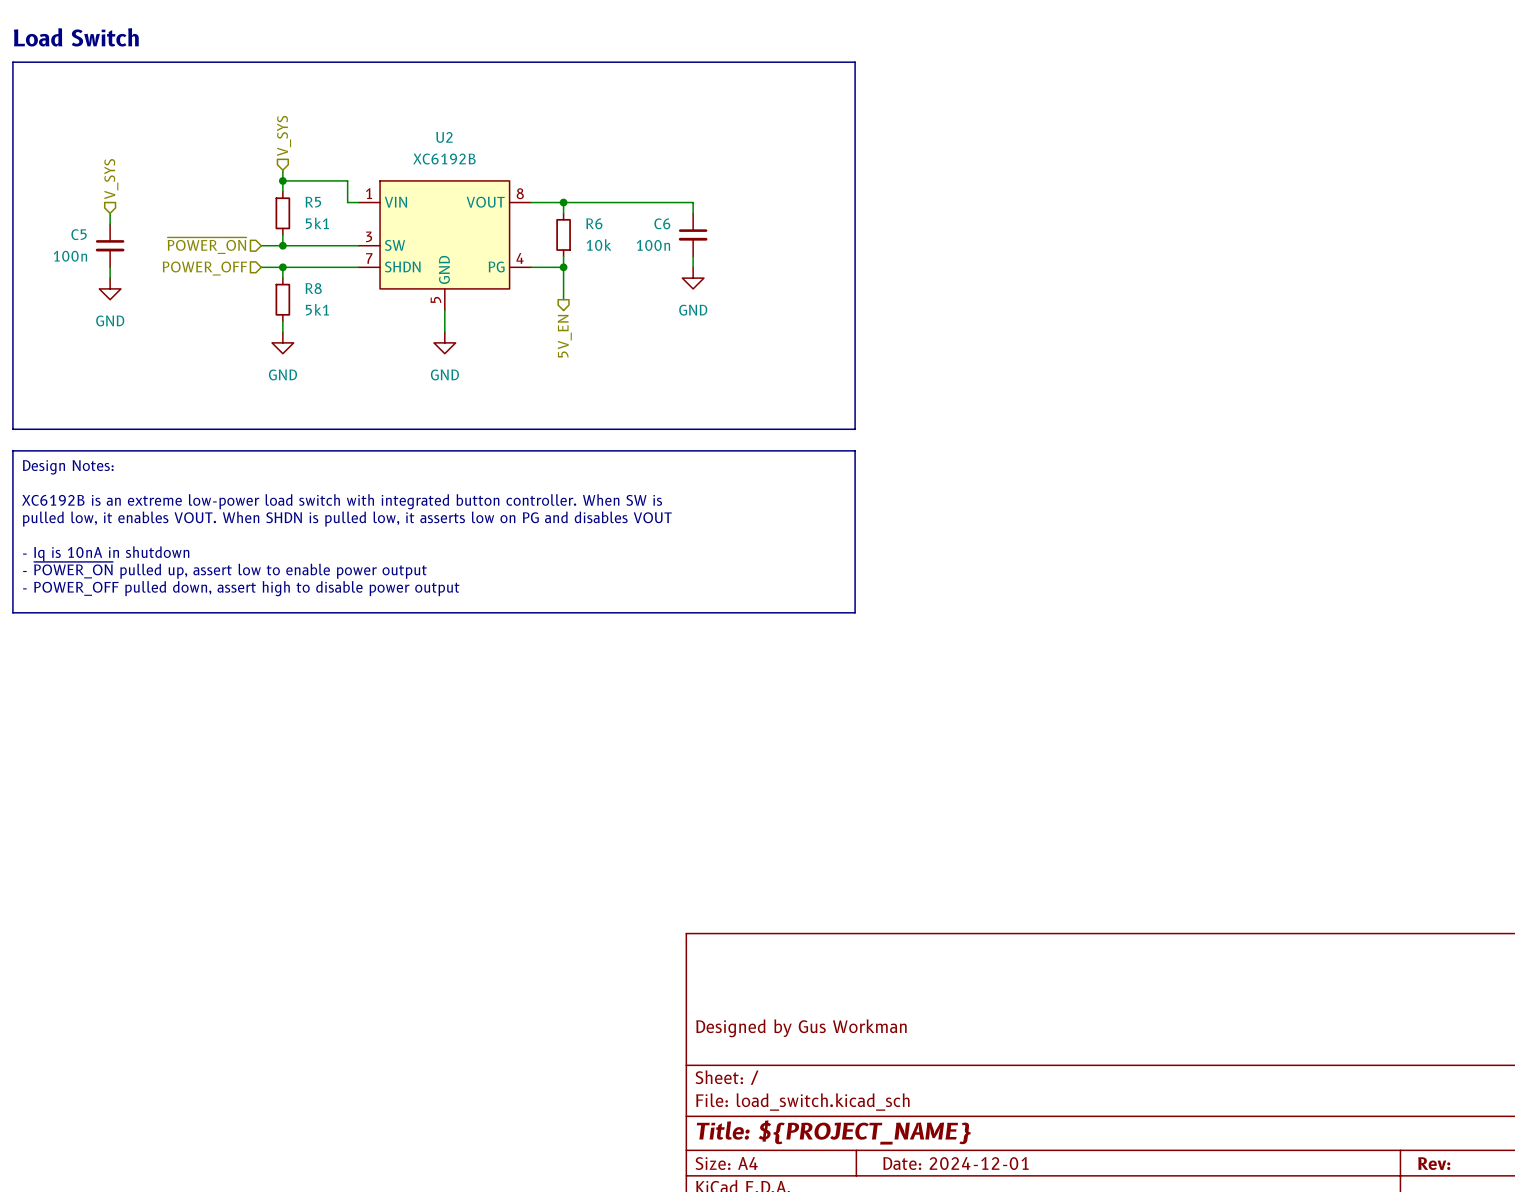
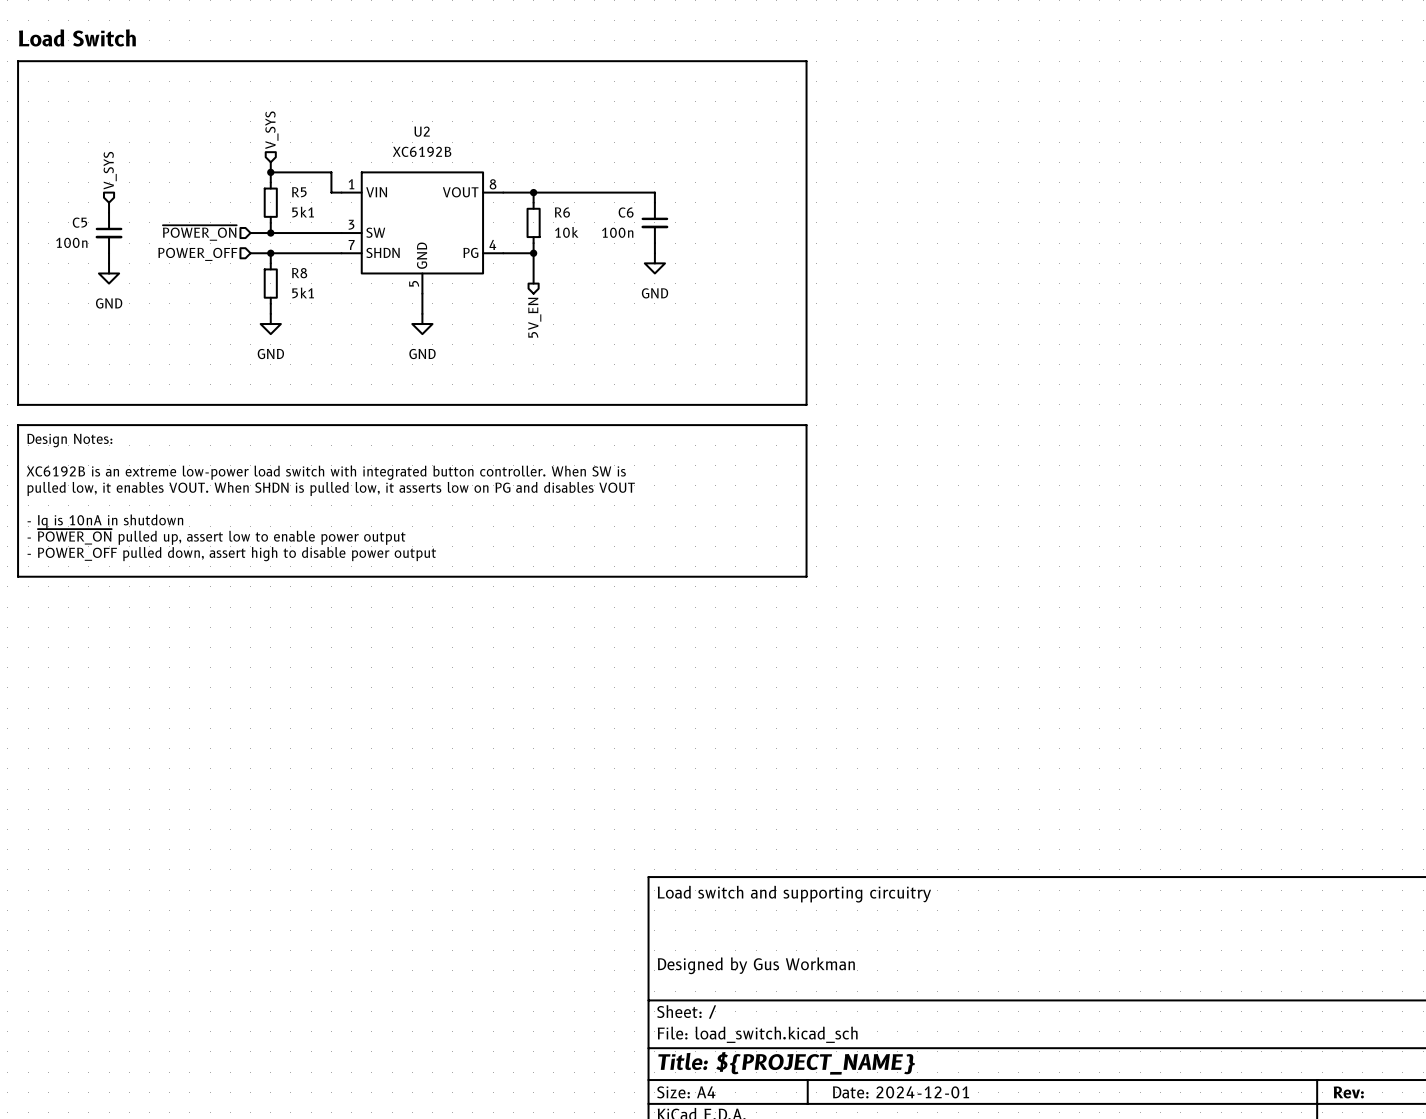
title block: none -> Load switch and supporting circuitry (794, 894)

